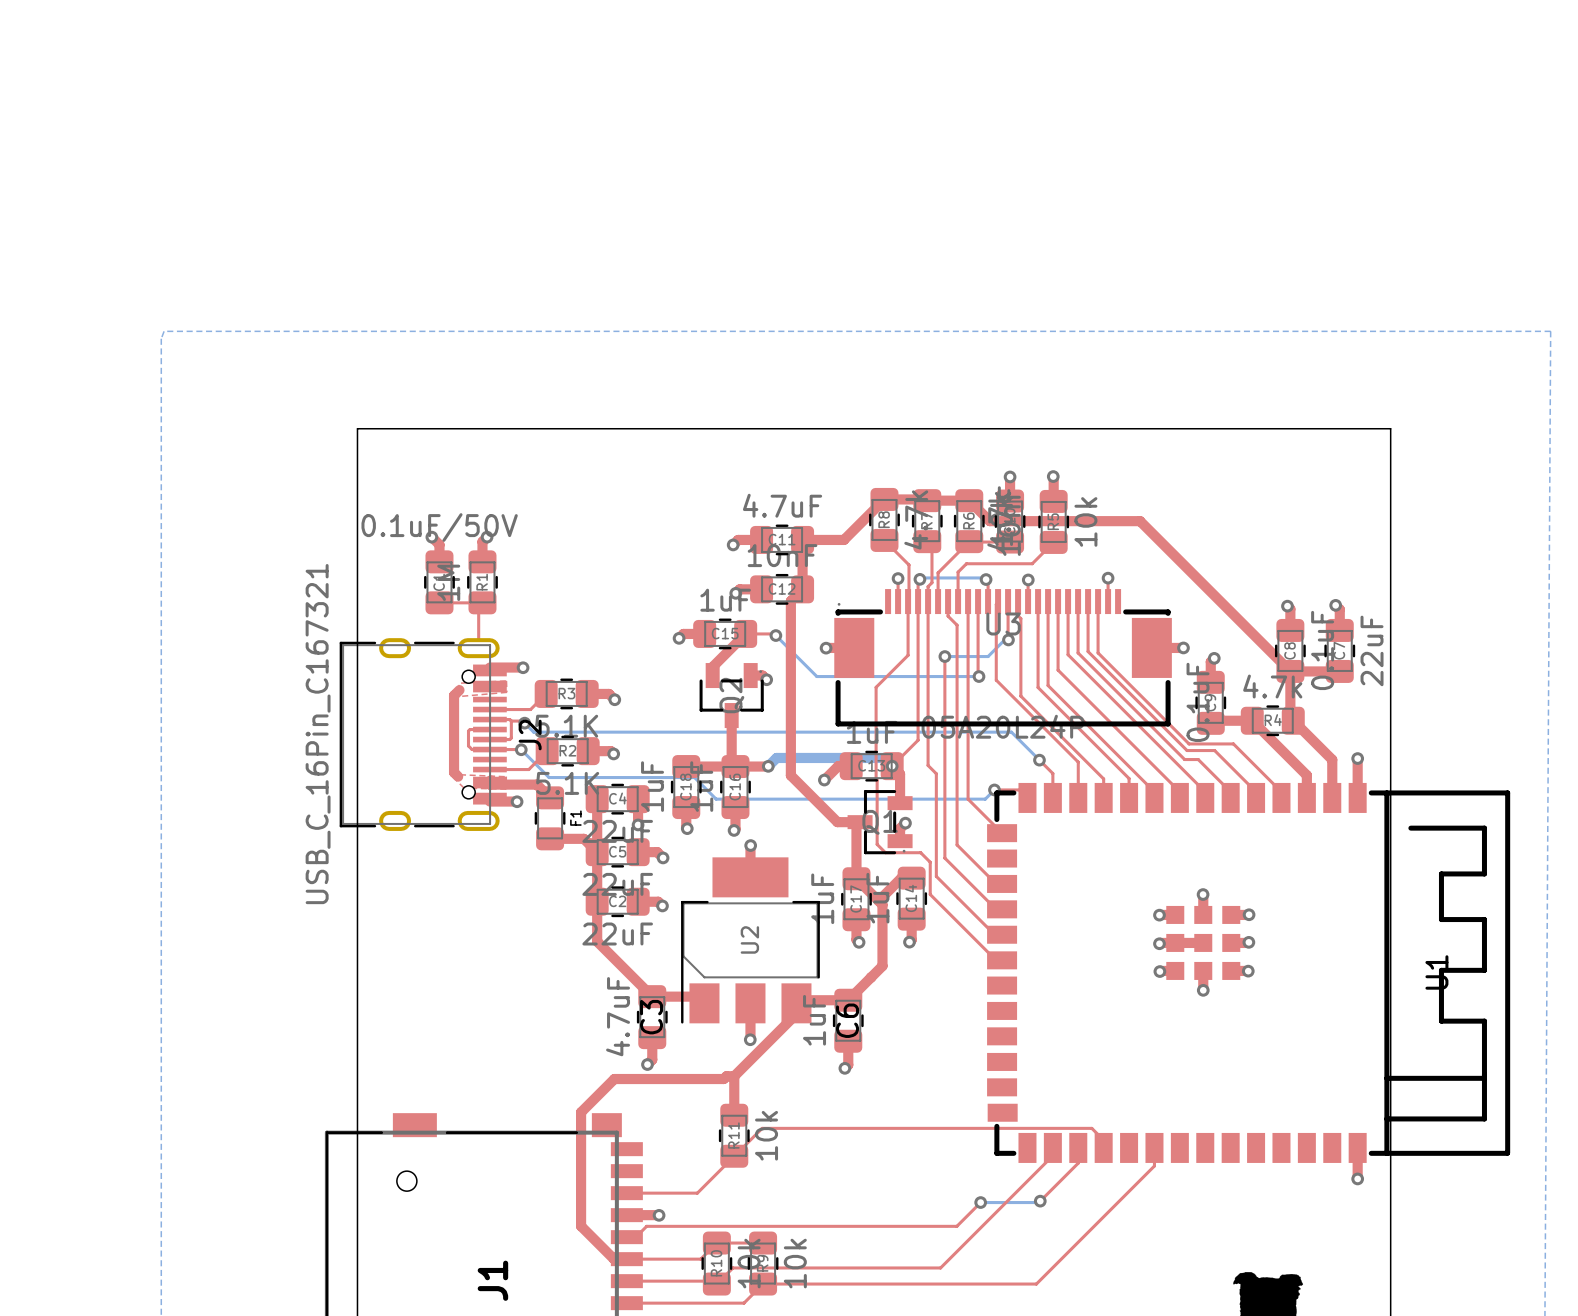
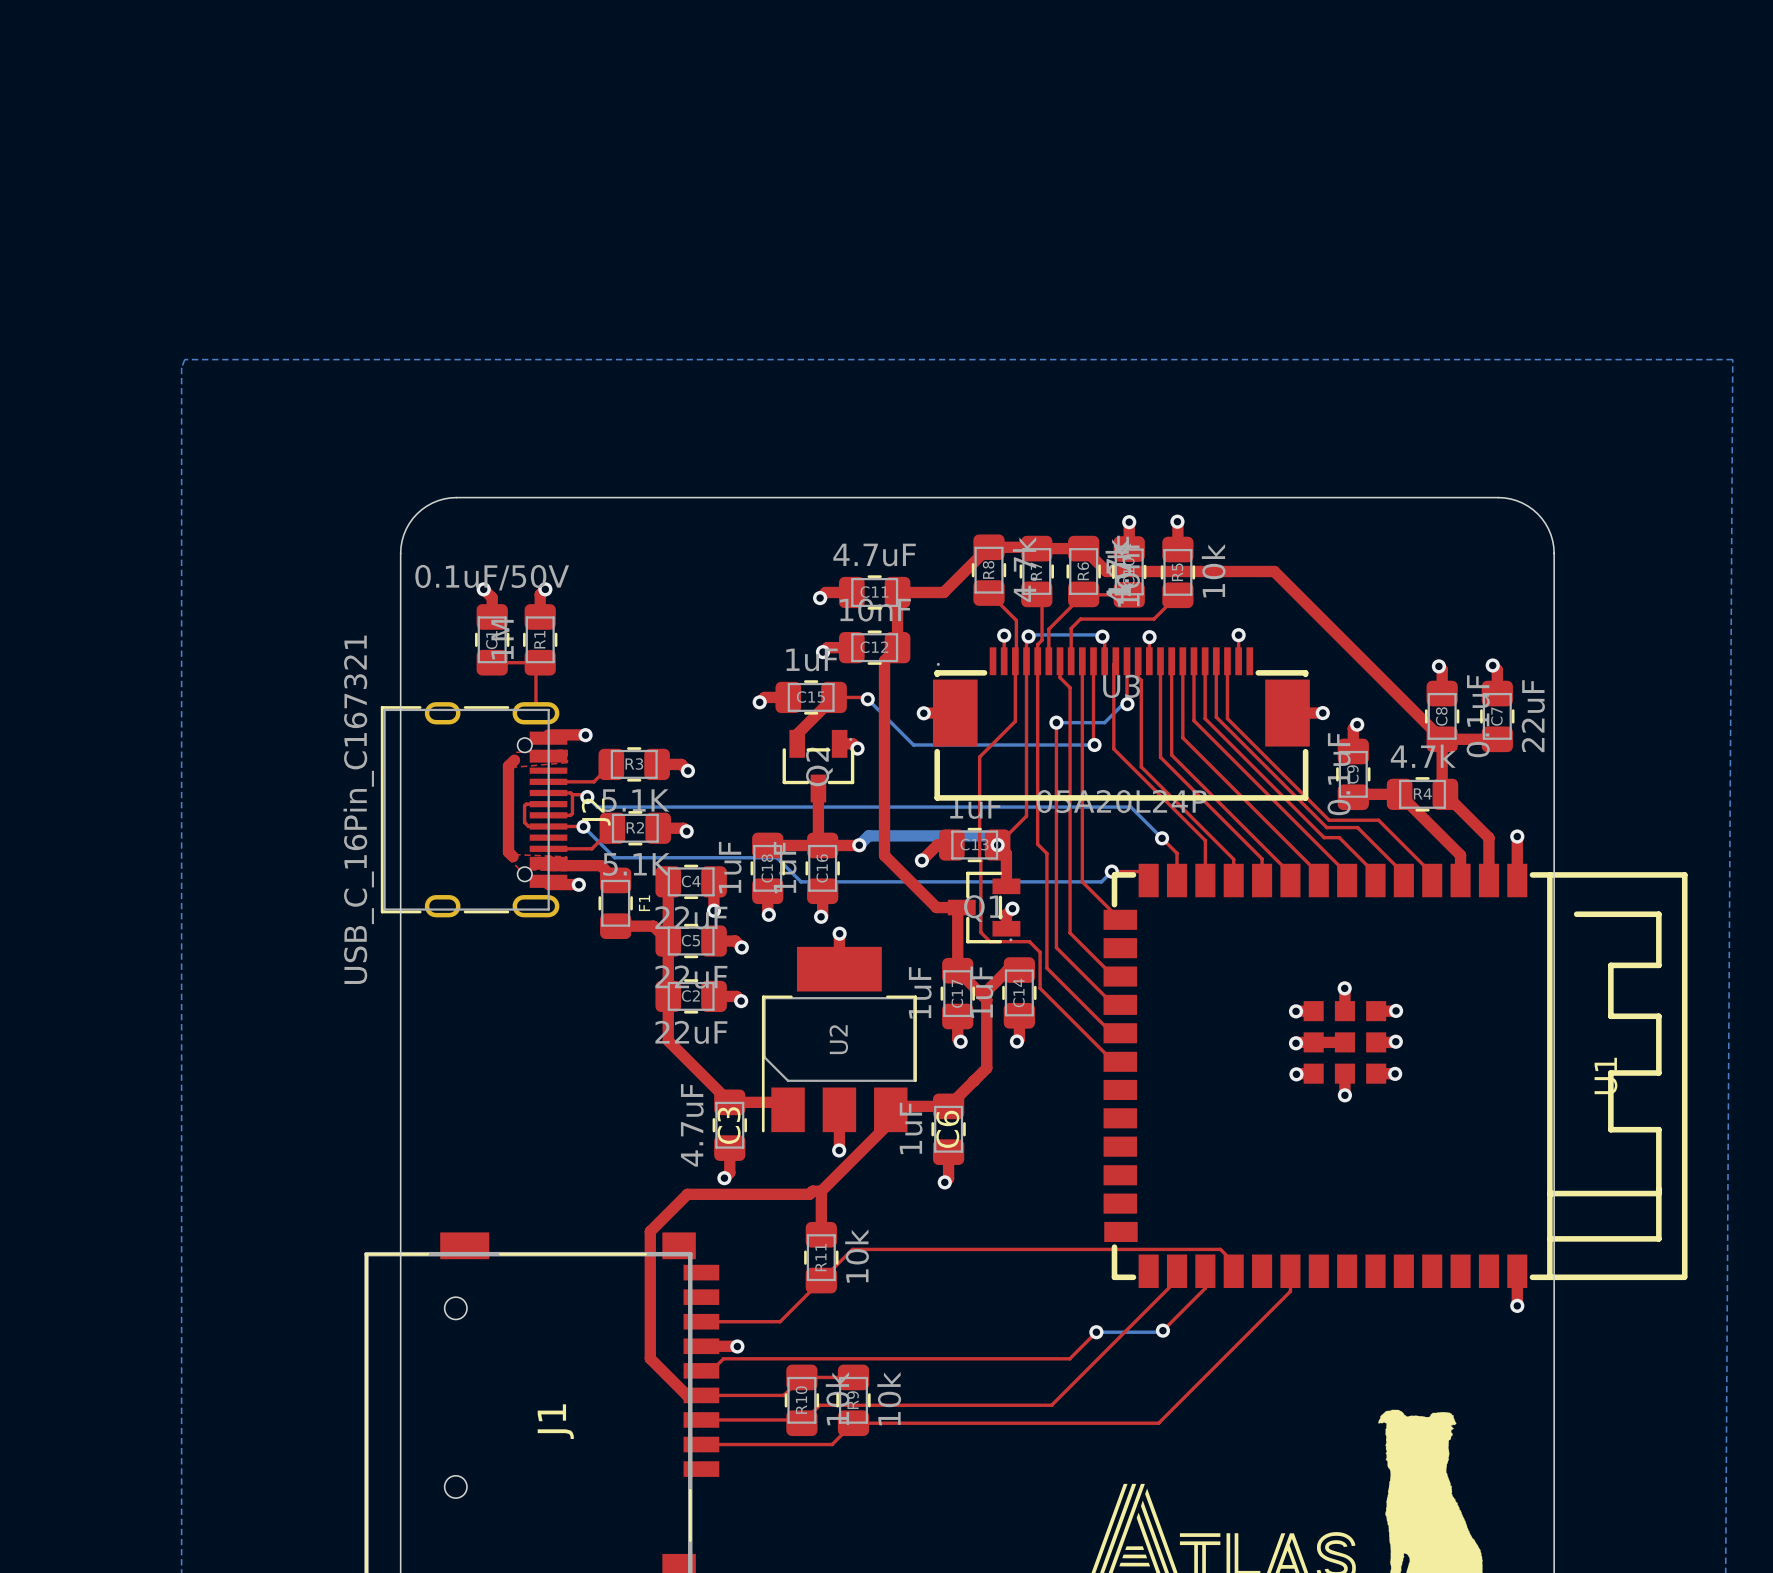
board edge: (357, 504) (357, 428) (1390, 428) (1390, 504) -> (400, 553) (406, 529) (417, 513) (432, 503) (456, 497) (1498, 497) (1516, 500) (1537, 513) (1548, 529) (1554, 553)

